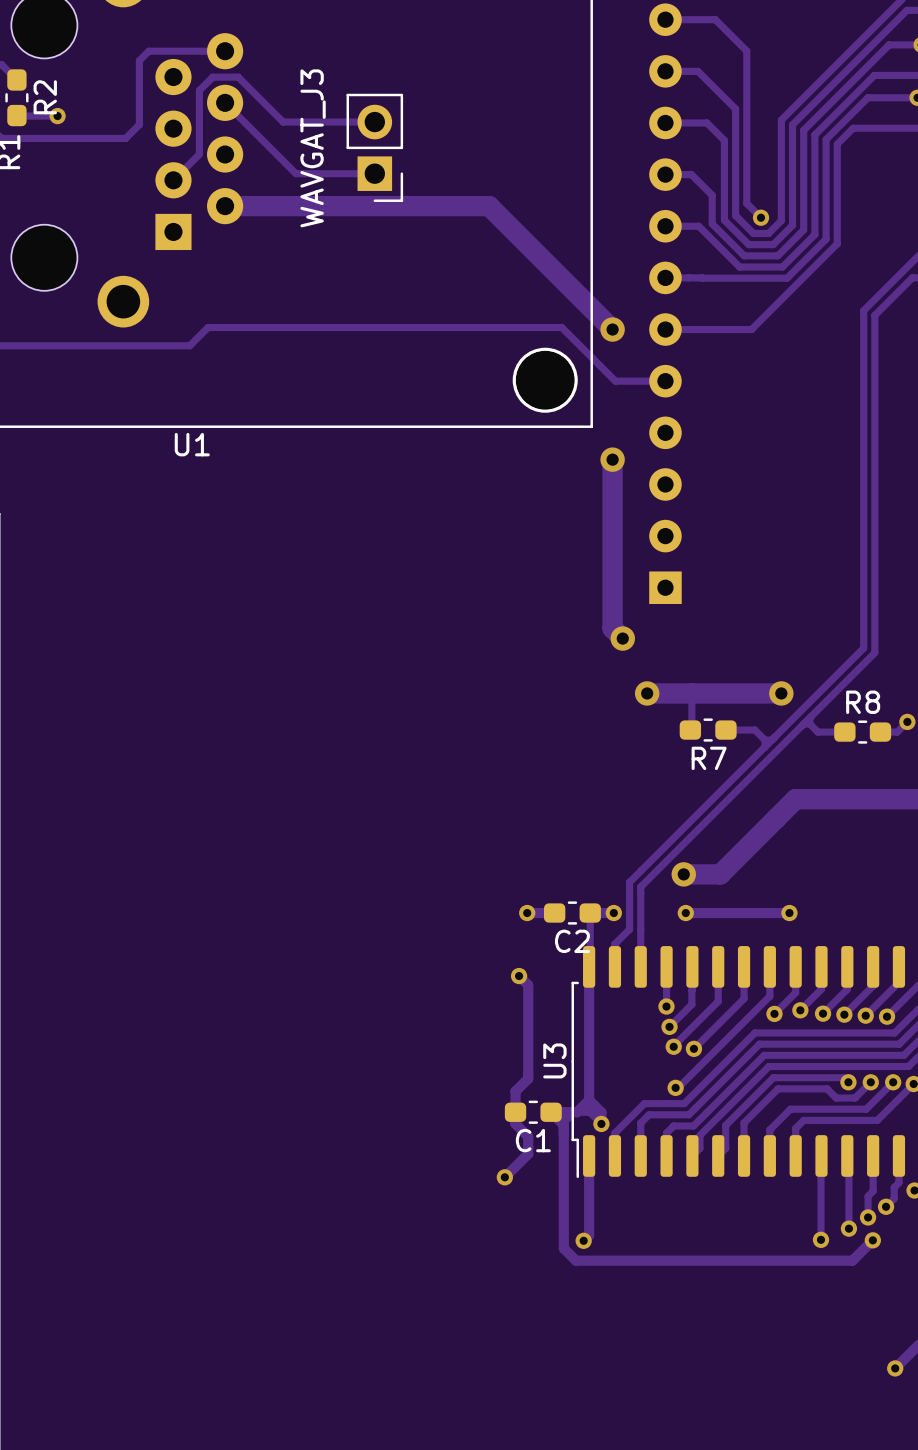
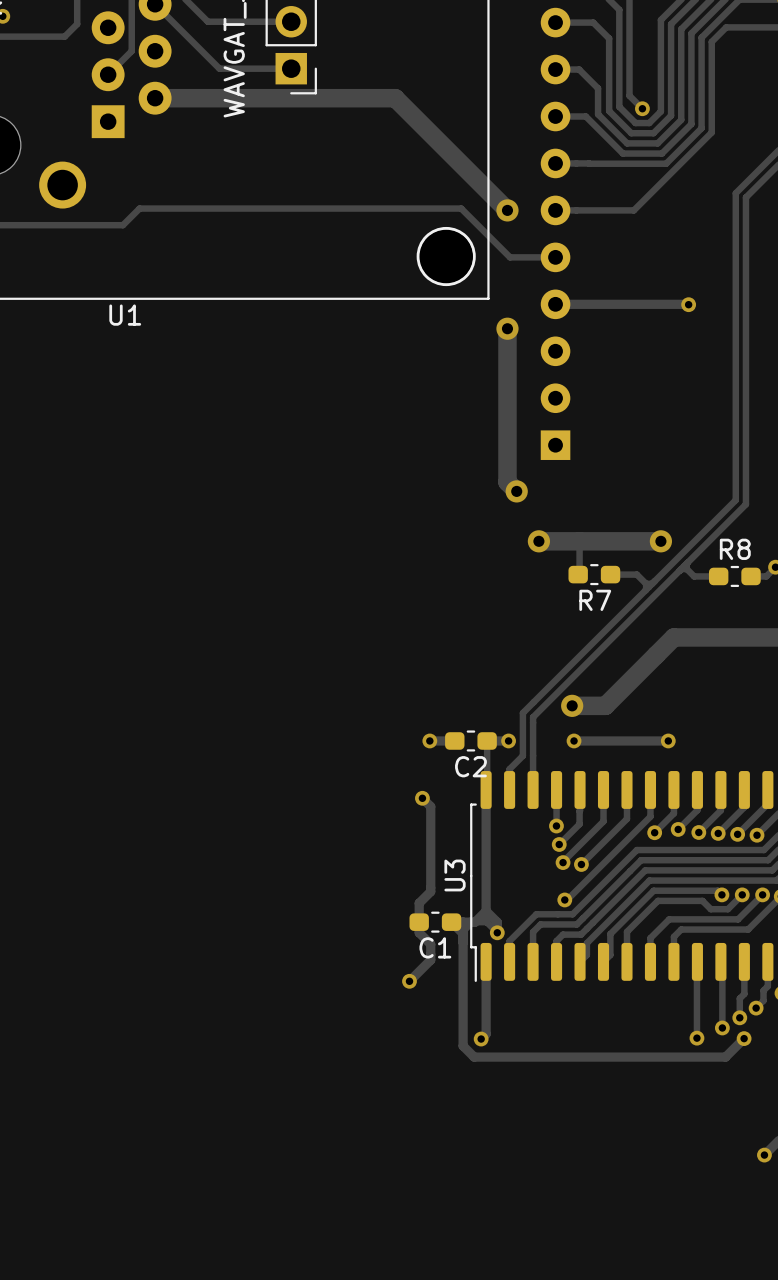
track: none -> (555, 304) (688, 304)
via: none -> (688, 304)

